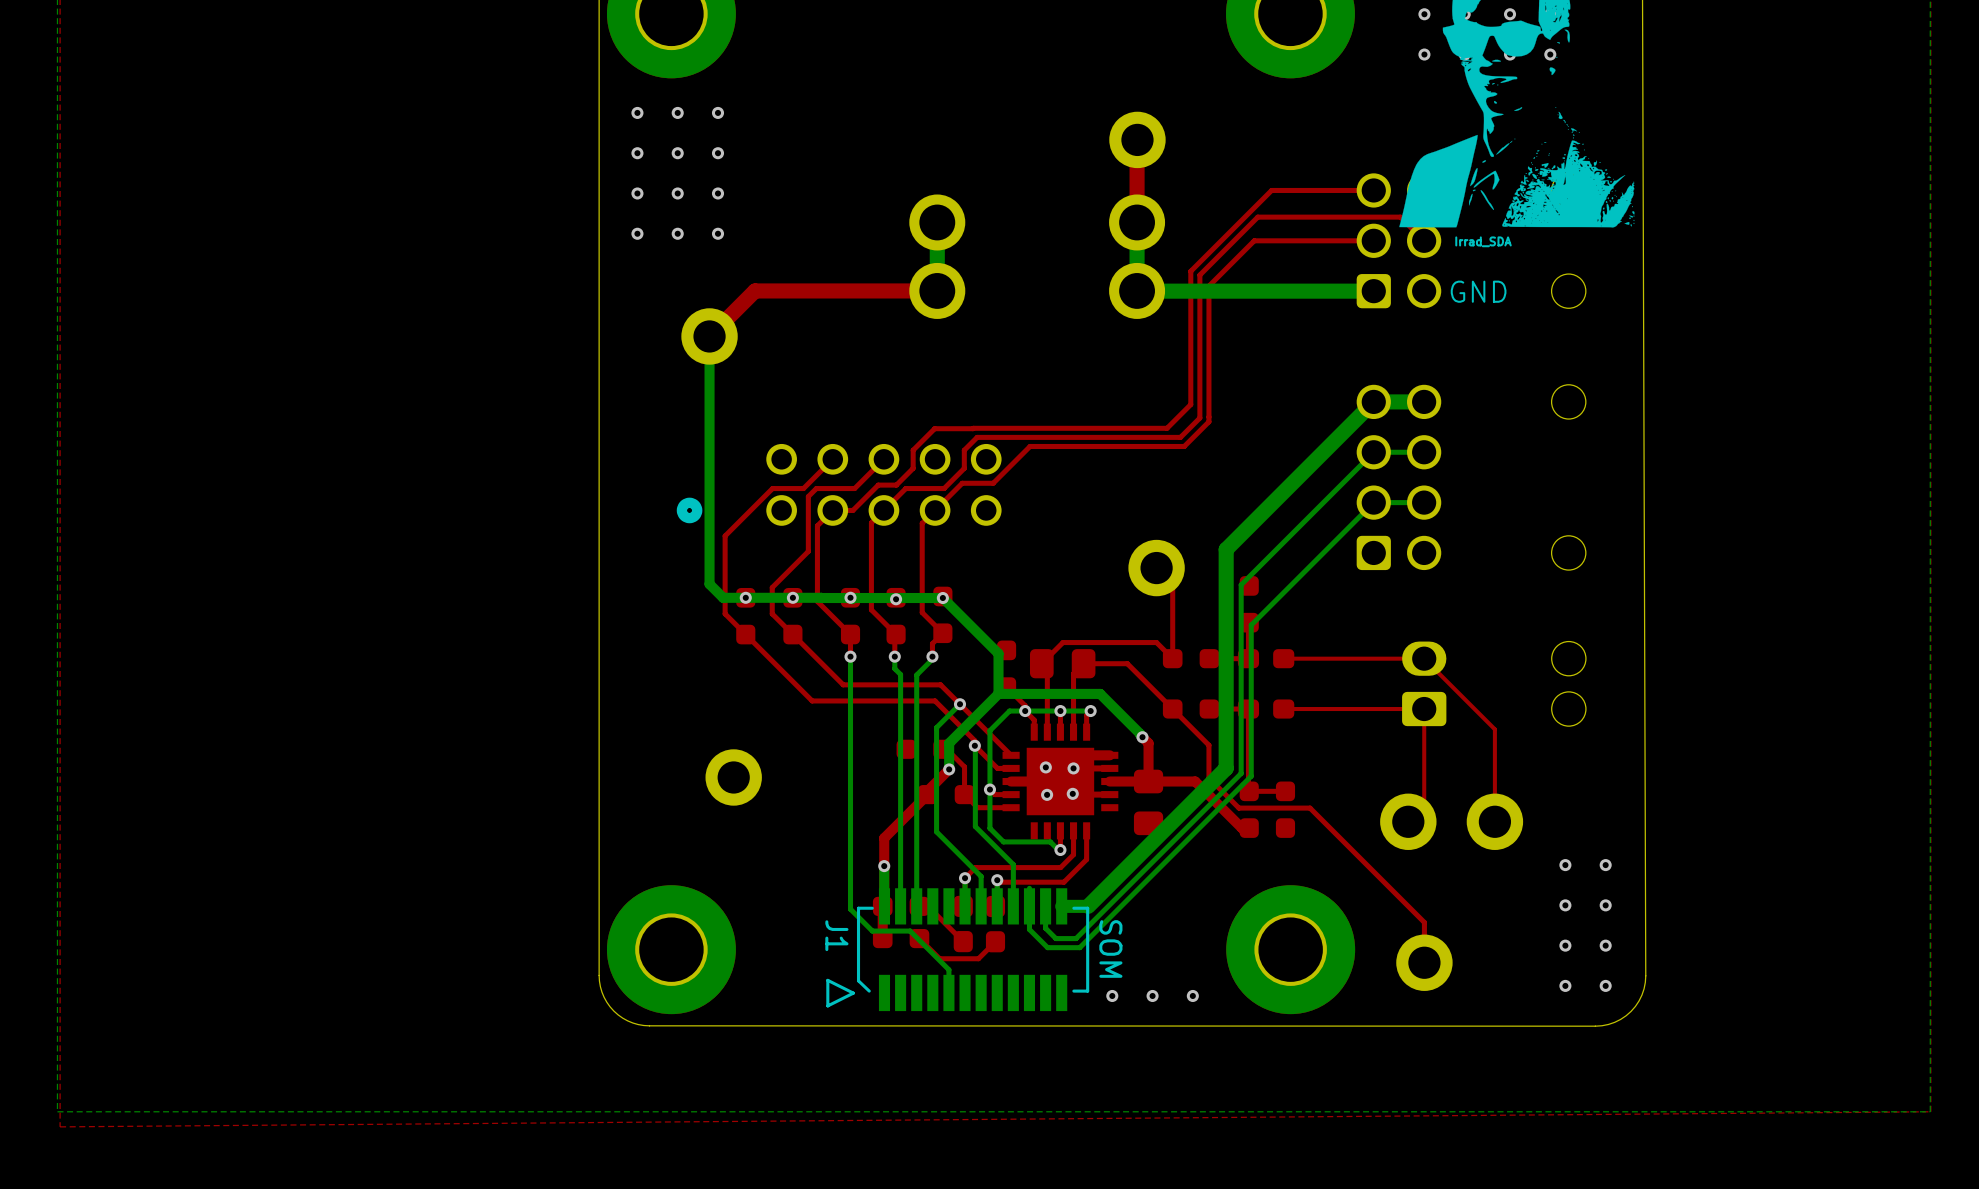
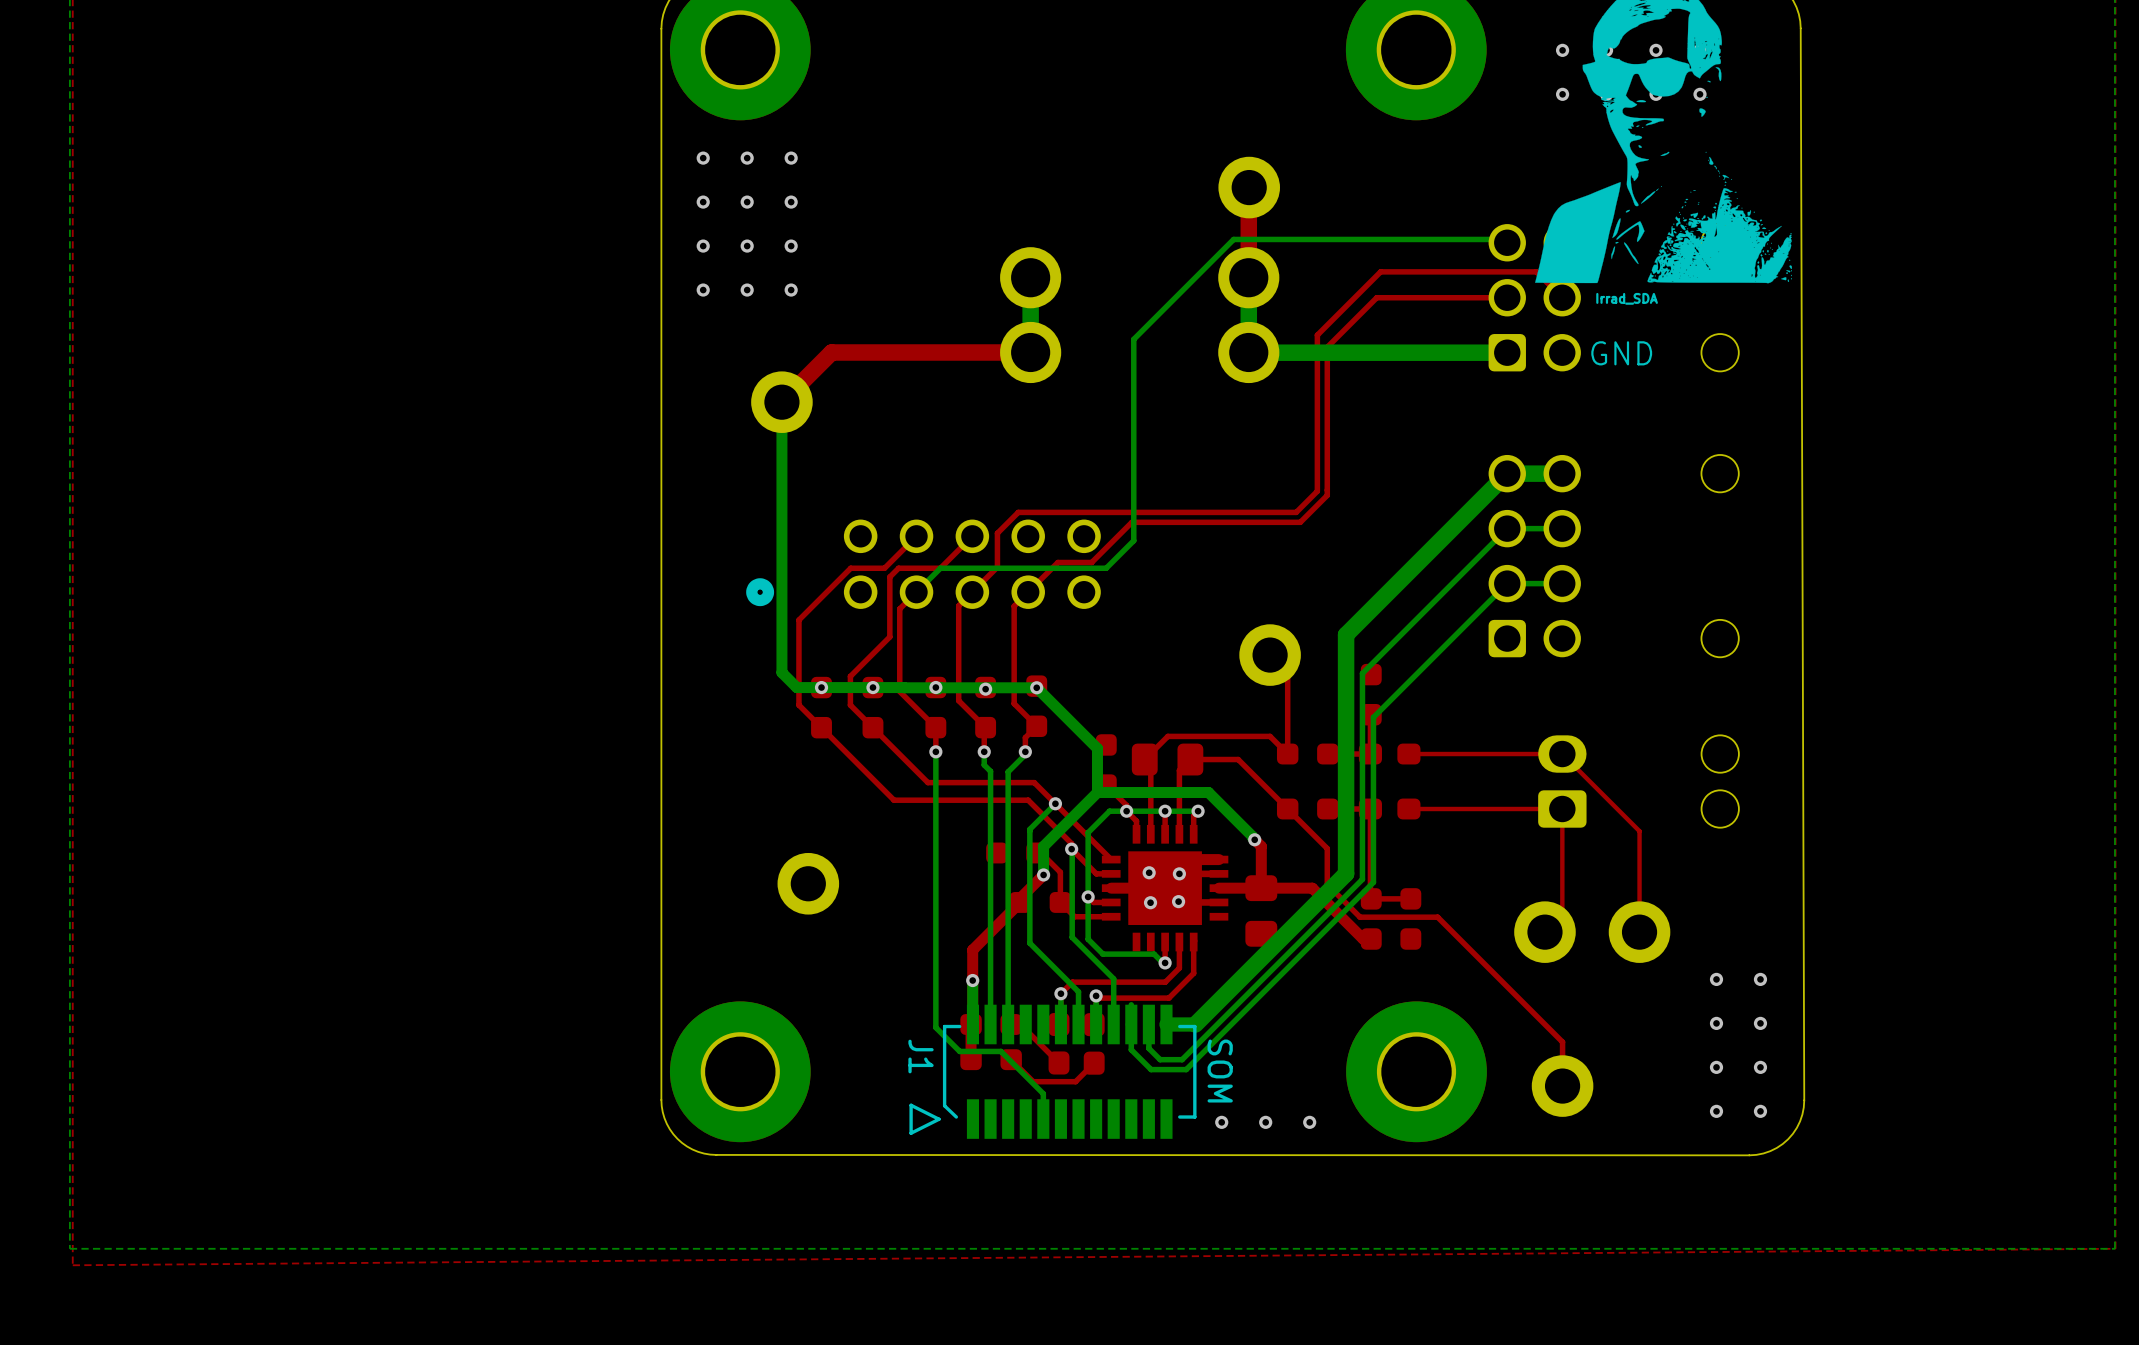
top track: (1373, 190) (1271, 190) (1190, 271) (1190, 404) (1167, 428) (934, 428) (926, 437) -> none
bottom track: none -> (1507, 242) (1503, 239) (1233, 239) (1133, 339) (1133, 540) (1106, 568) (940, 568) (916, 592)
top track: (977, 437) (964, 450) (964, 468) (944, 488) (905, 488) -> (1074, 512) (1018, 512)
top track: (913, 450) (913, 468) (896, 485) (878, 485) (852, 510) (832, 510) -> (1004, 526) (997, 533) (996, 568)

